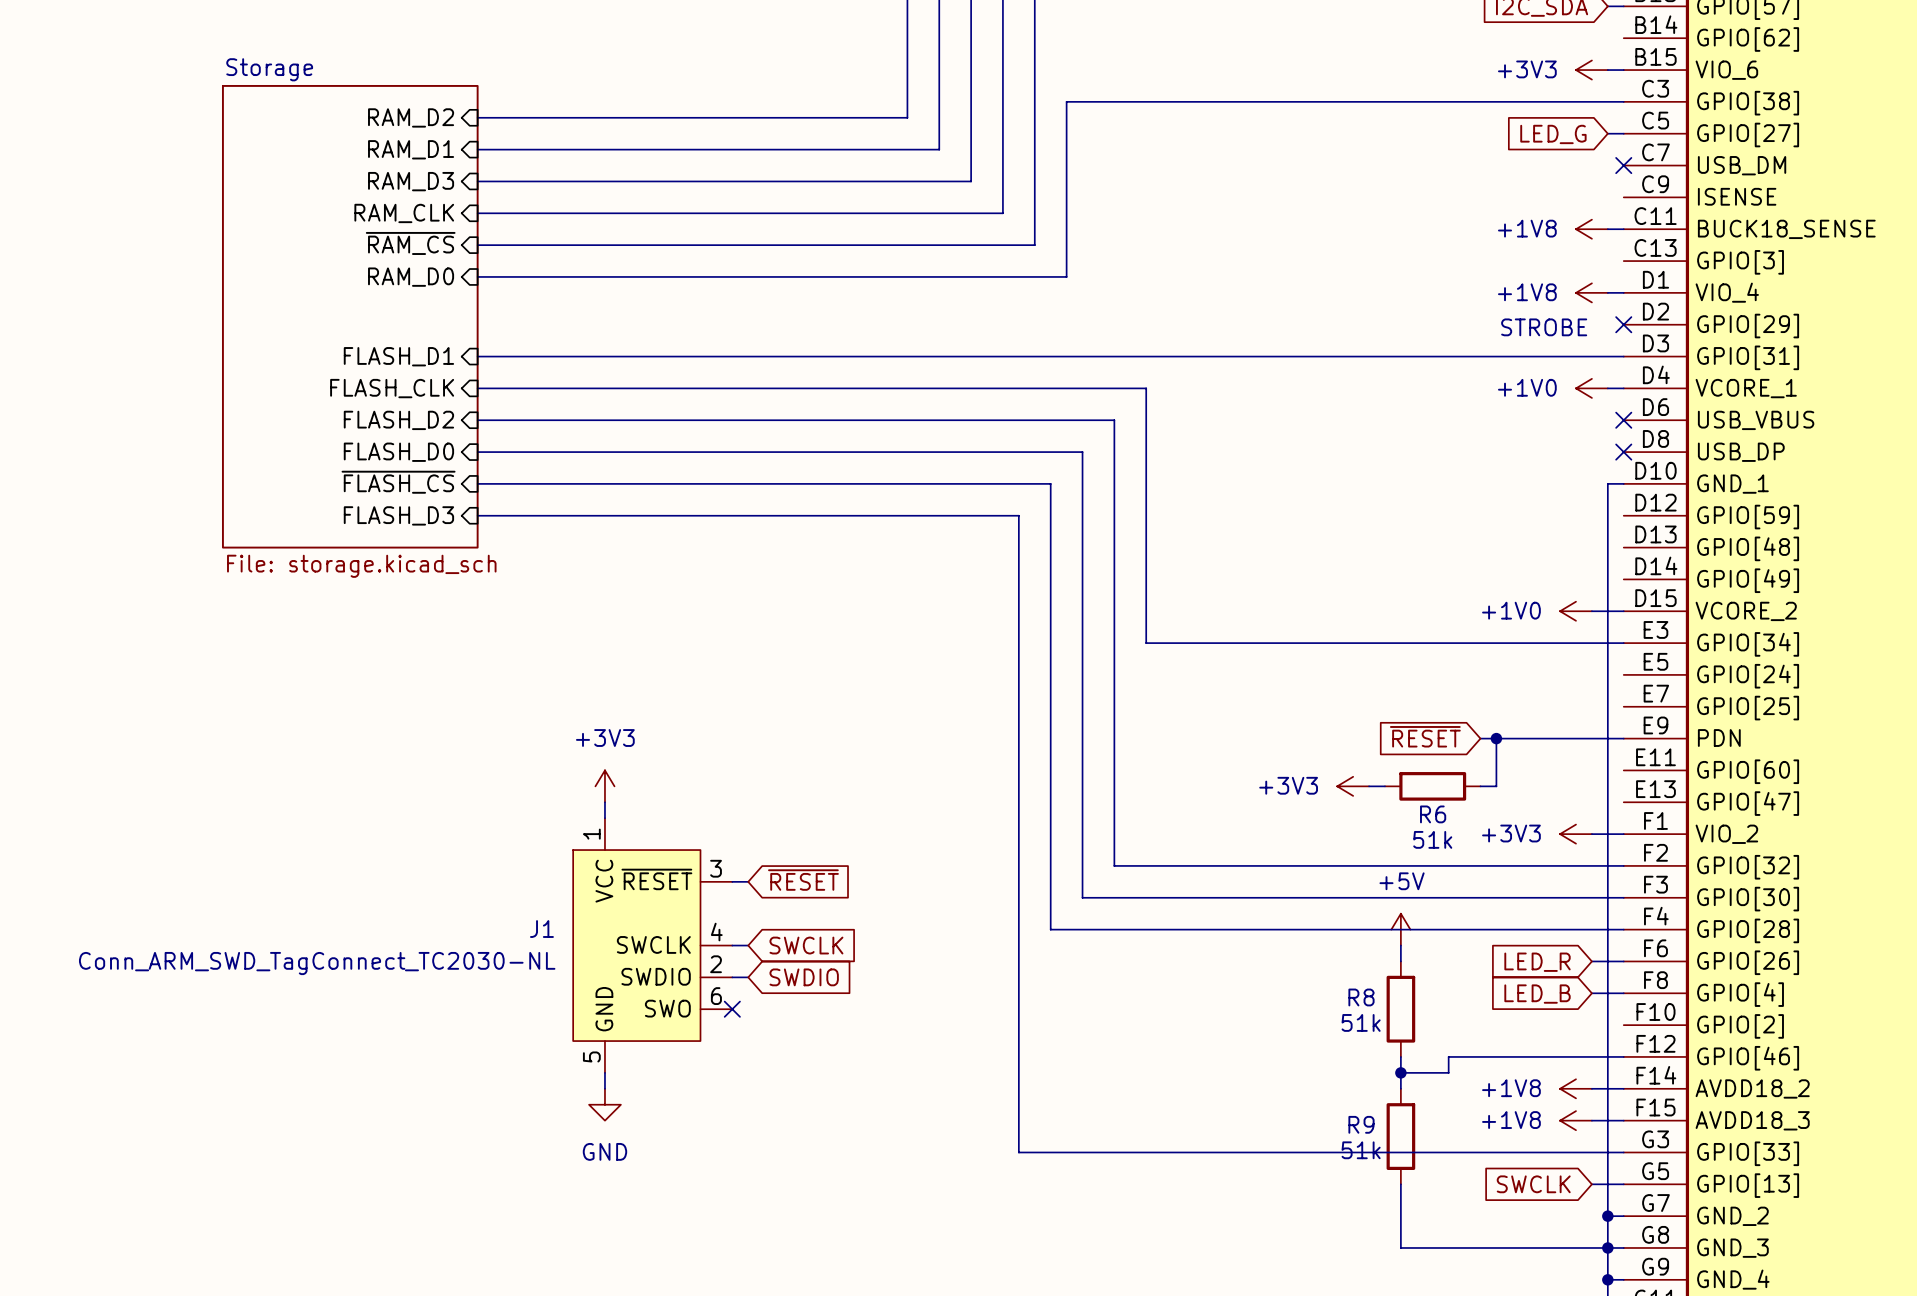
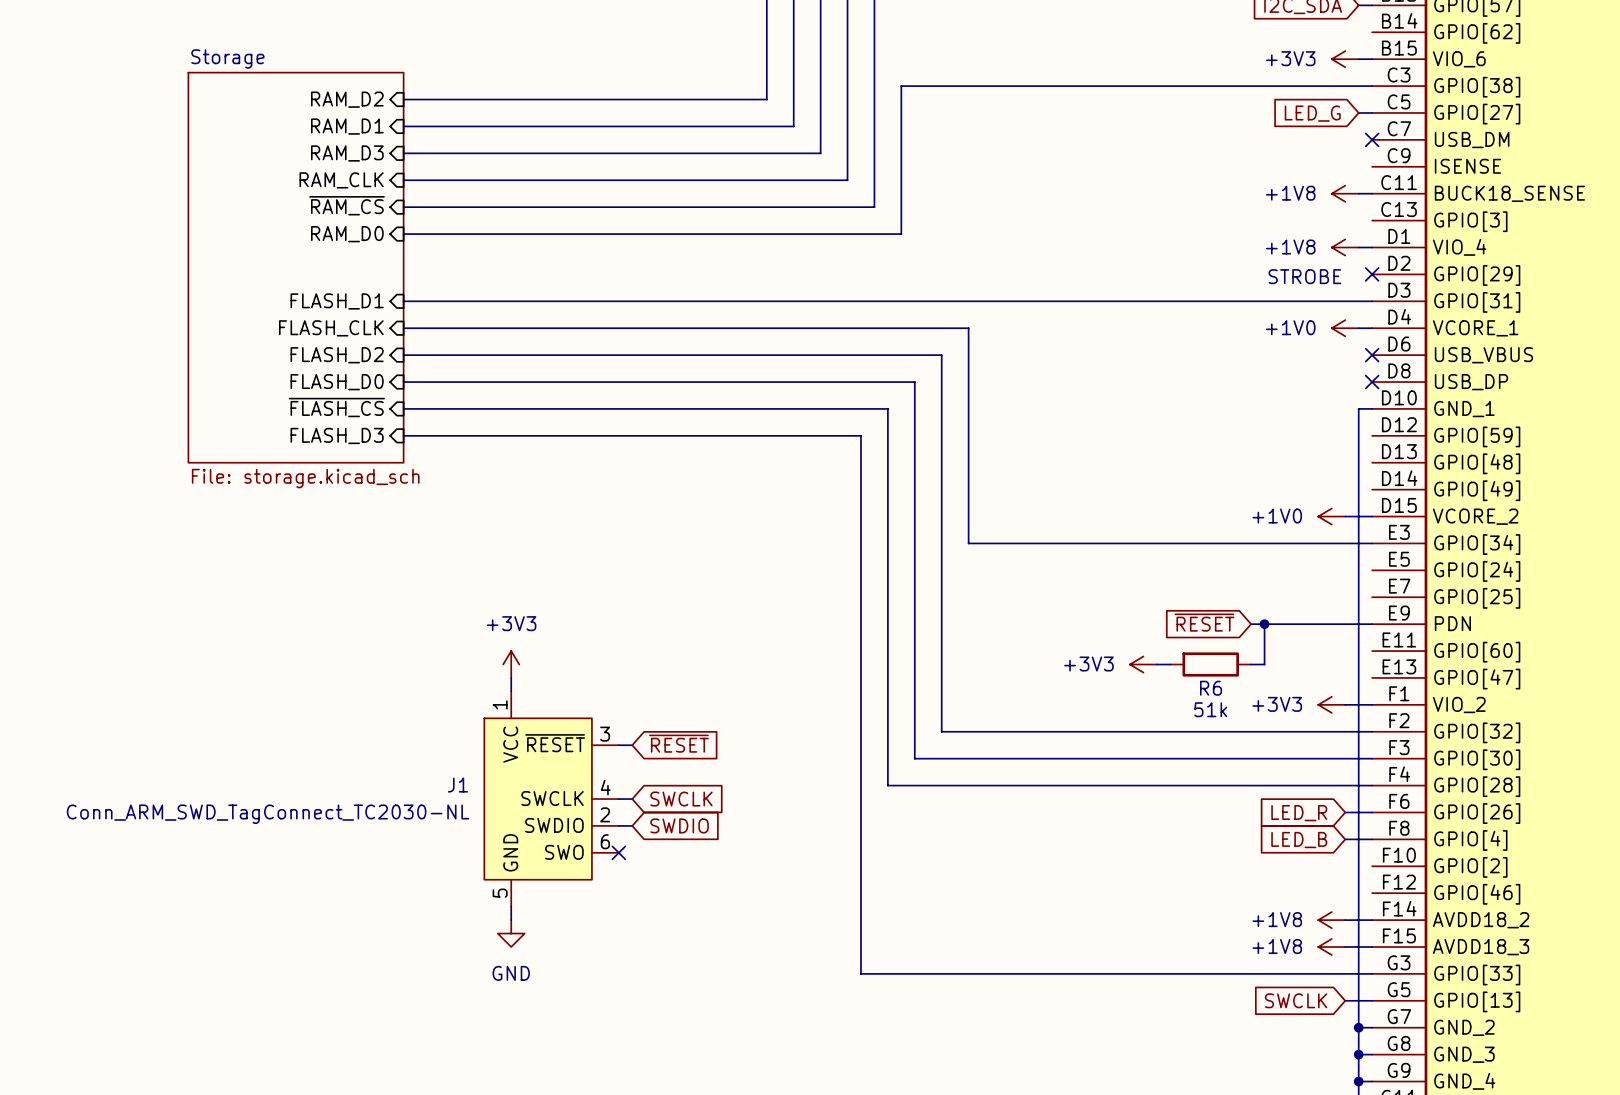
power symbol: +5V (1400, 929) -> none
wire: (1400, 945) (1400, 961) -> none
R8: 51k (1400, 1009) -> none
wire: (1400, 1056) (1400, 1088) -> none
wire: (1623, 1056) (1448, 1056) (1448, 1072) (1400, 1072) -> none
junction: (1400, 1072) -> none
R9: 51k (1400, 1136) -> none
wire: (1400, 1184) (1400, 1247) (1607, 1247) -> none

